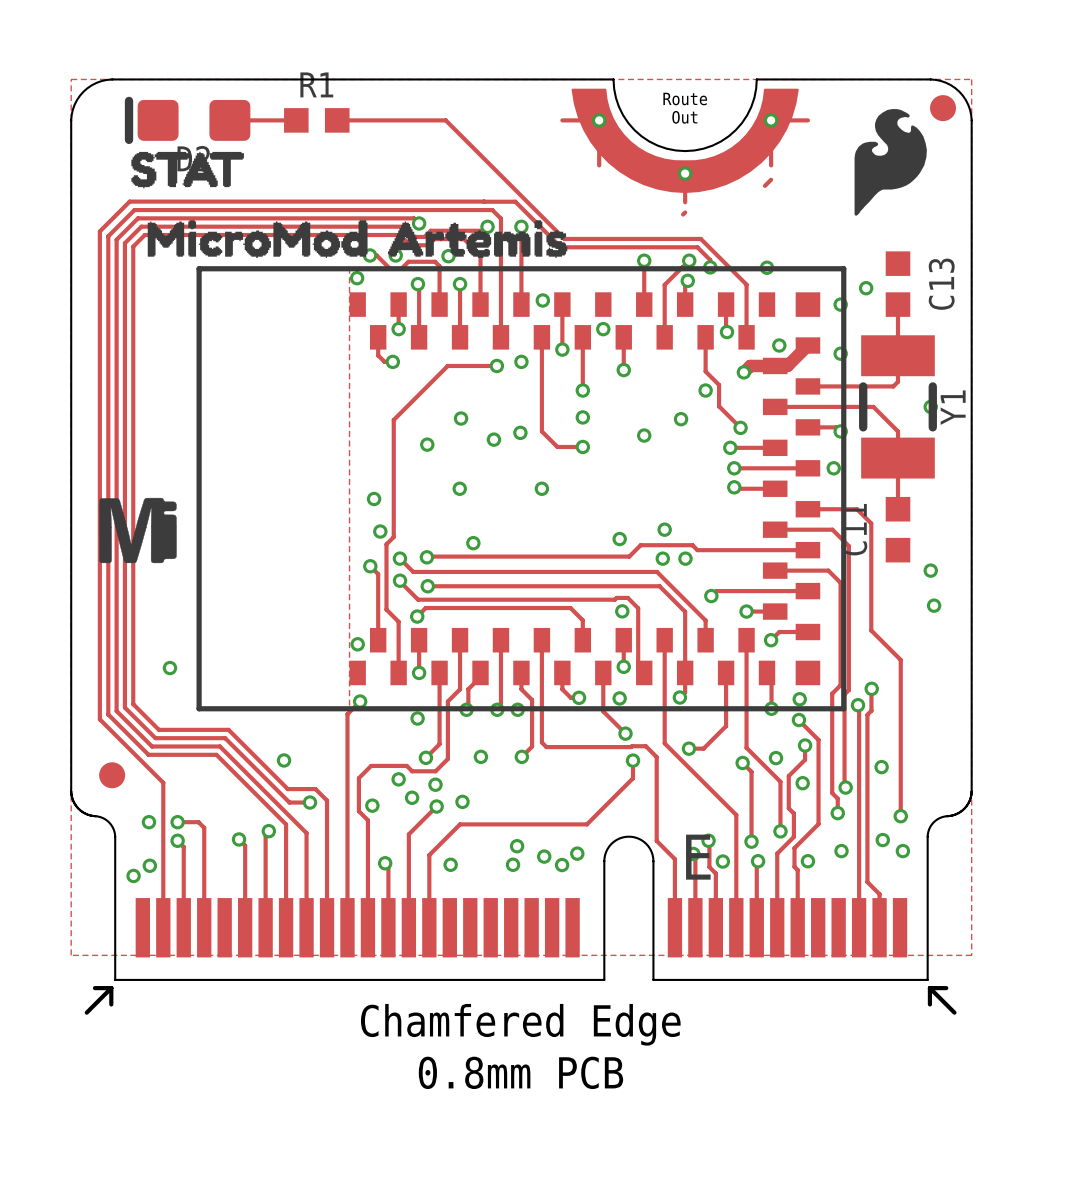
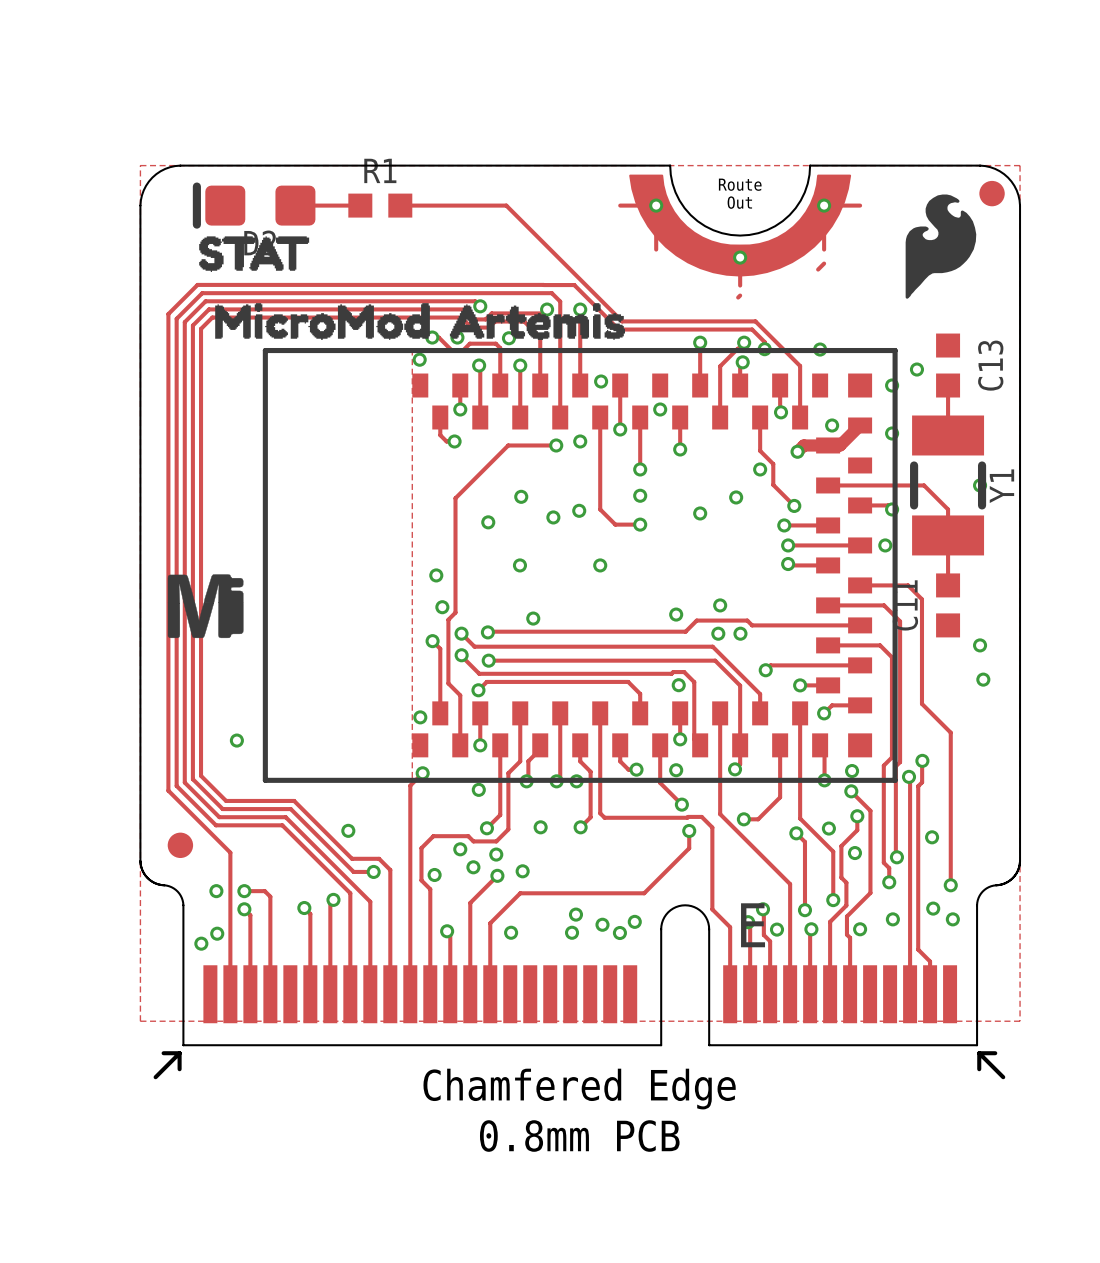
track: (897, 355) (897, 381) (893, 386) (807, 386) -> none

